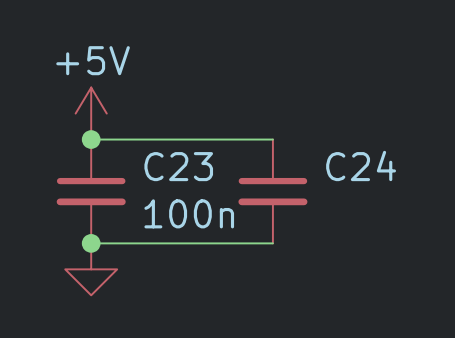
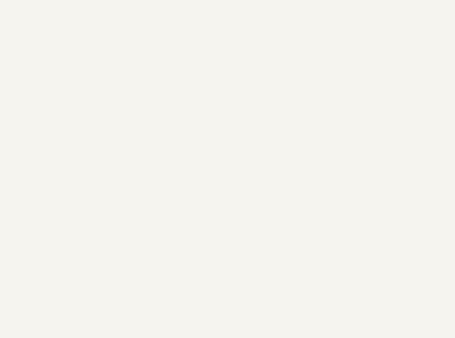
power symbol: +5V (91, 113) -> none
wire: (91, 139) (272, 139) -> none
junction: (91, 139) -> none
C23: 100n (91, 191) -> none
C24: (272, 191) -> none
wire: (91, 243) (272, 243) -> none
junction: (91, 243) -> none
power symbol: (91, 269) -> none

